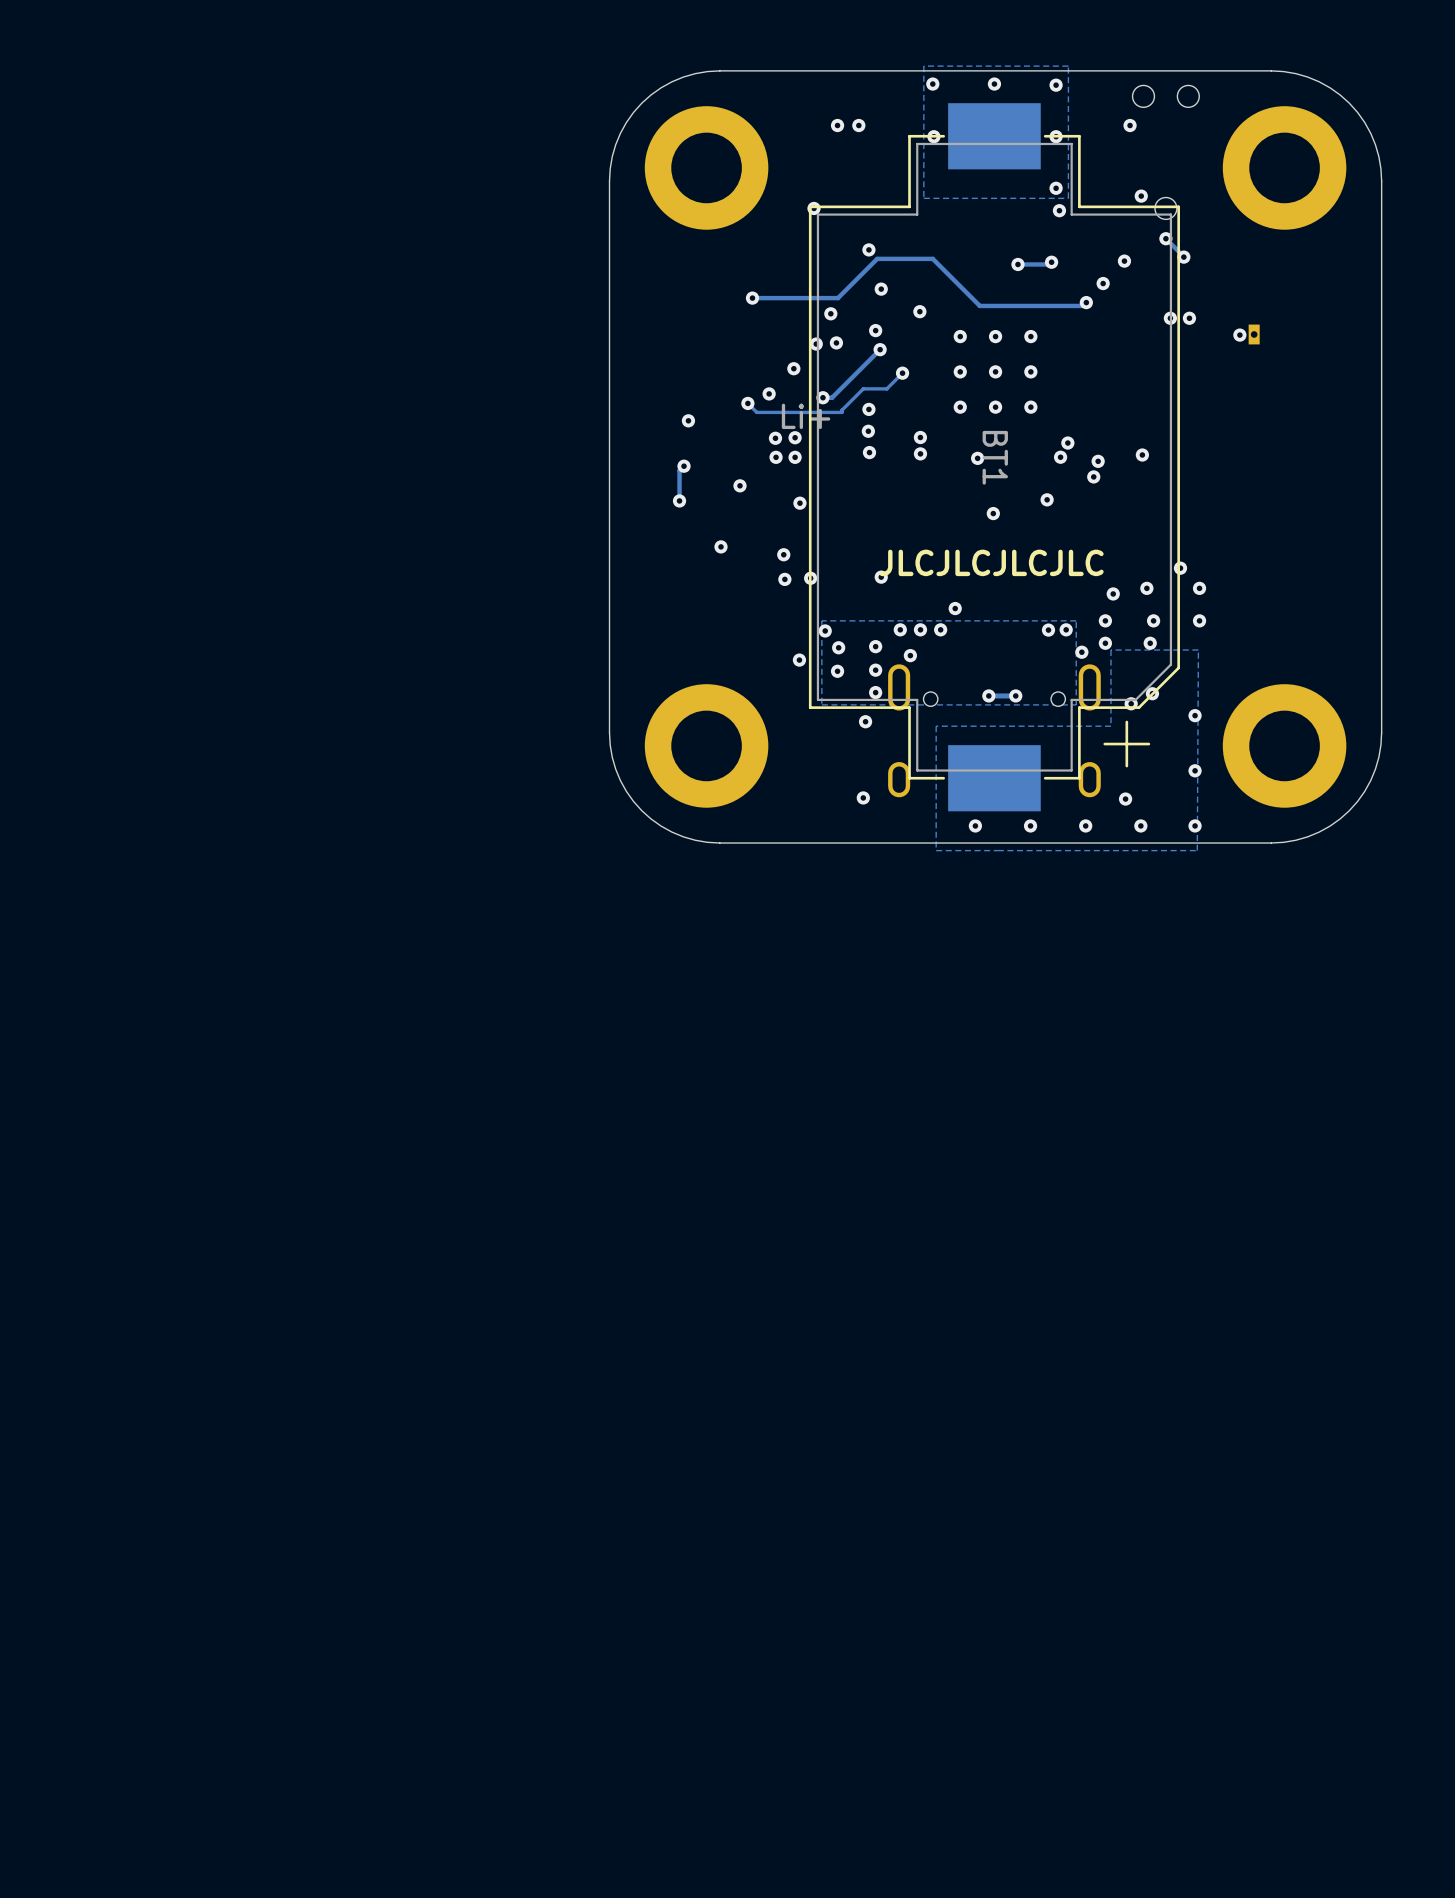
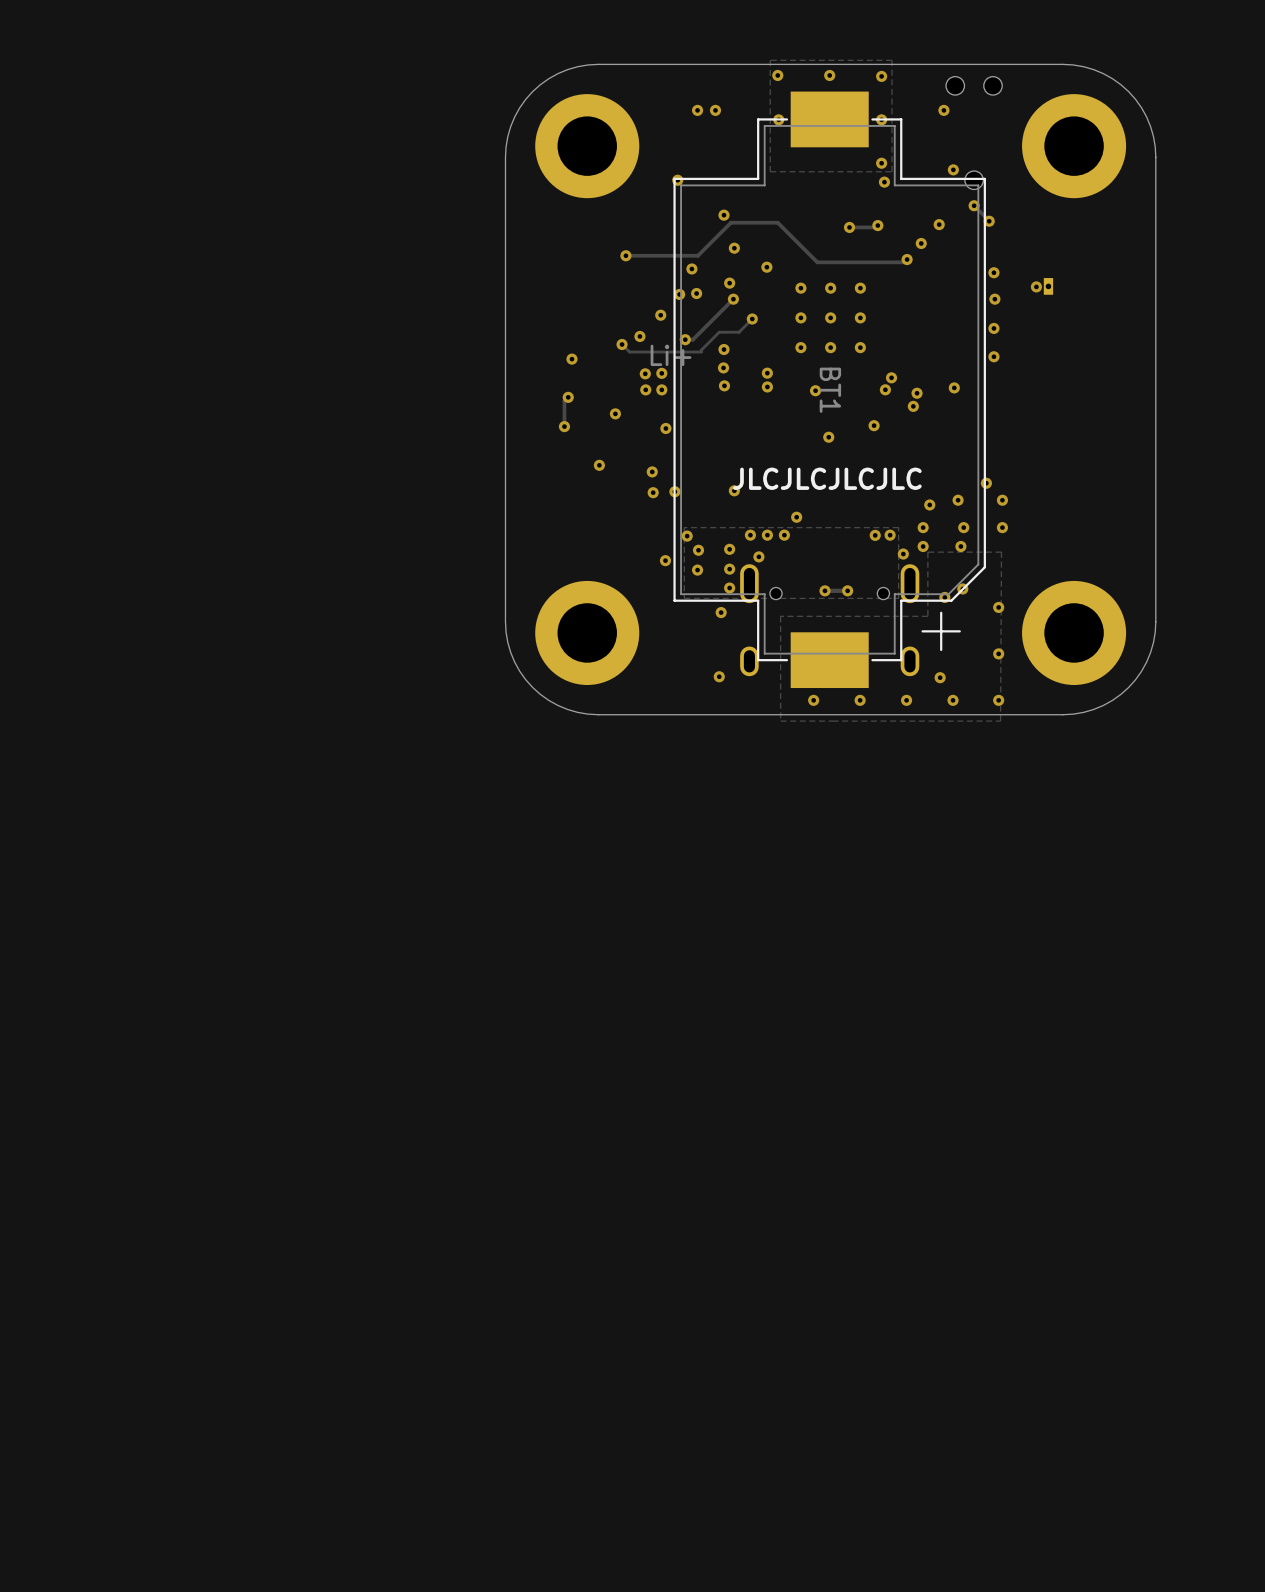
via: (1170, 318) -> none
via: none -> (994, 299)
via: none -> (993, 328)
via: none -> (993, 356)

